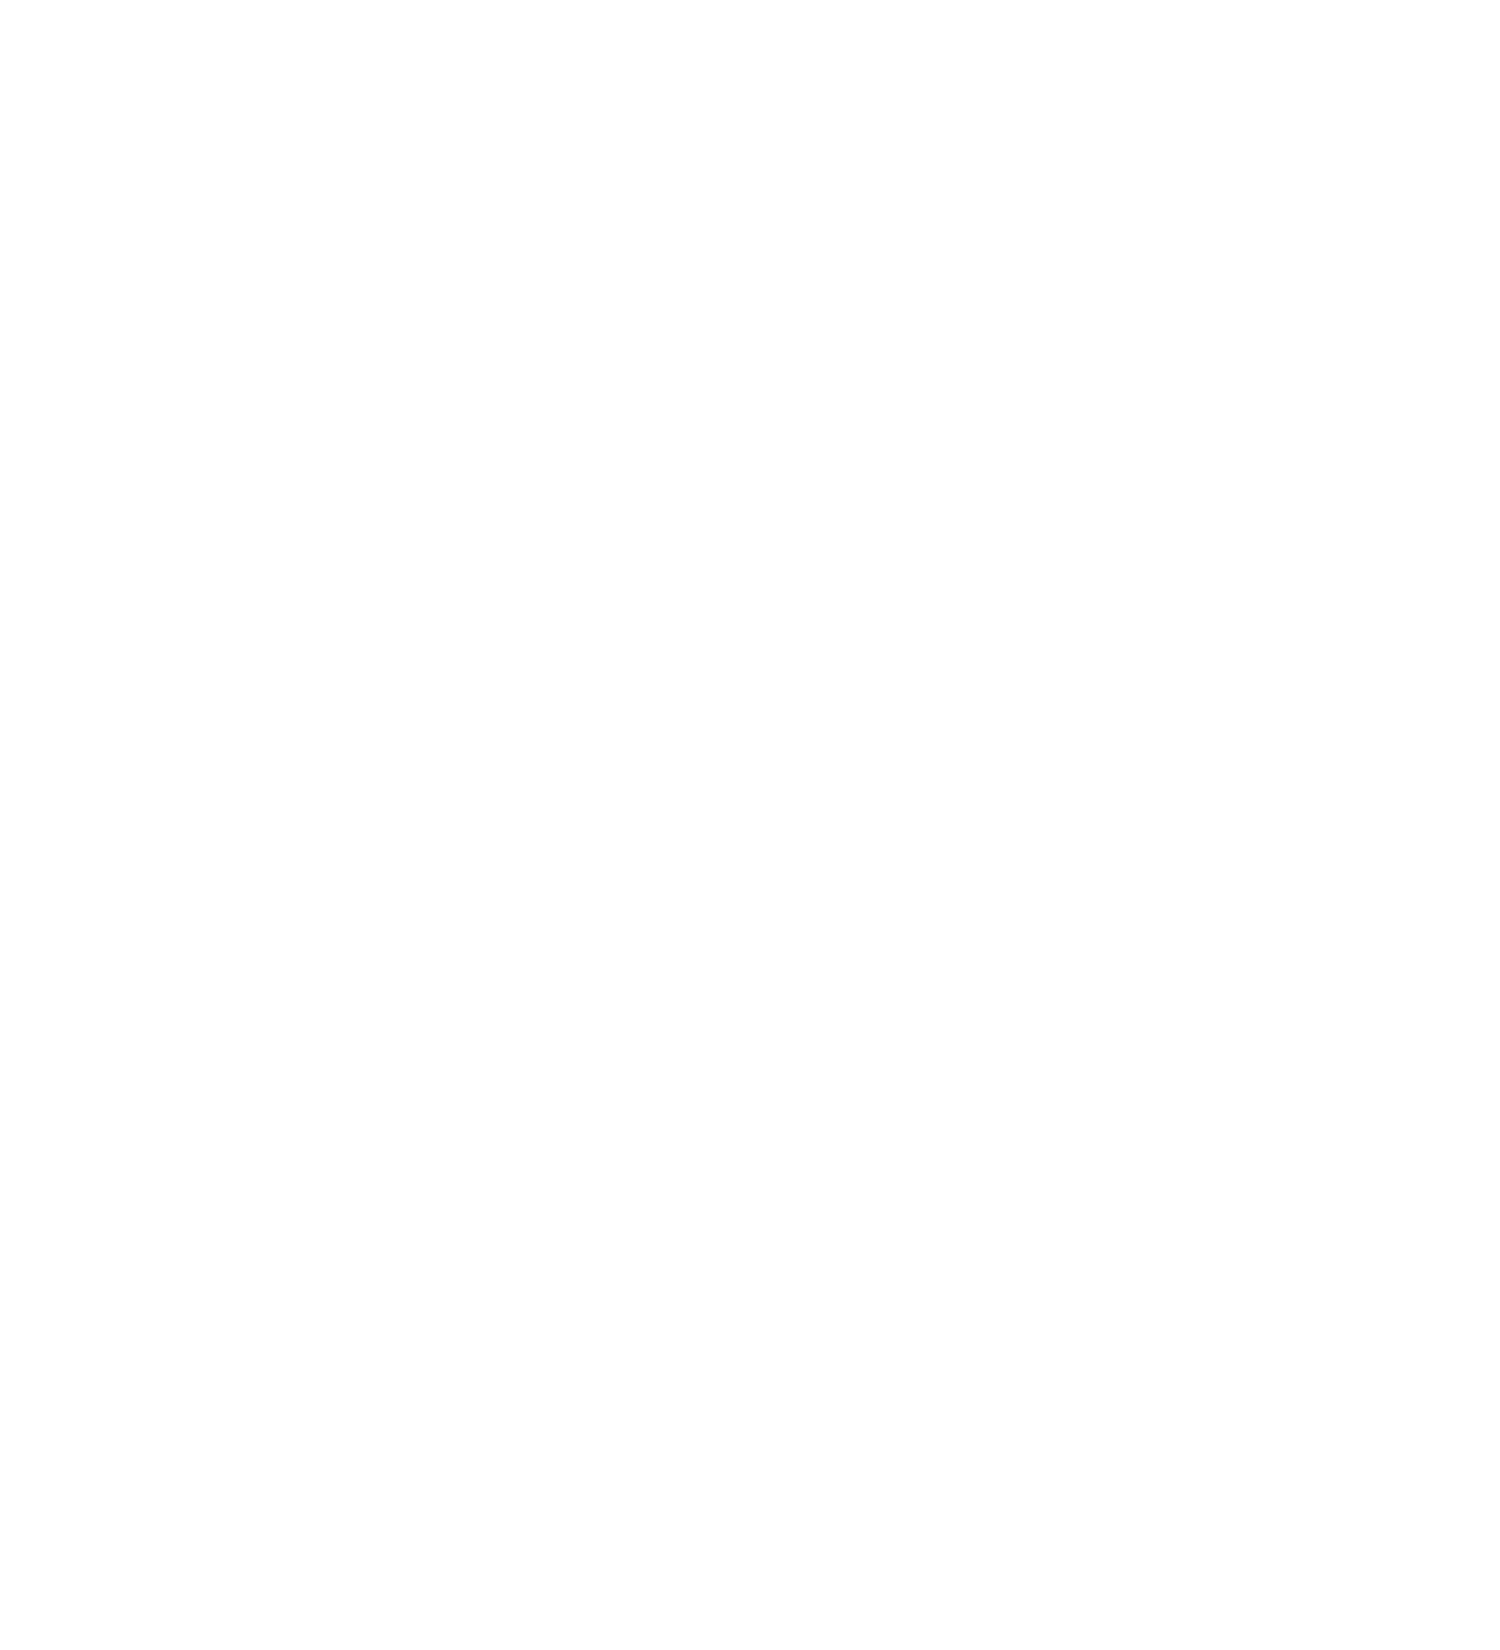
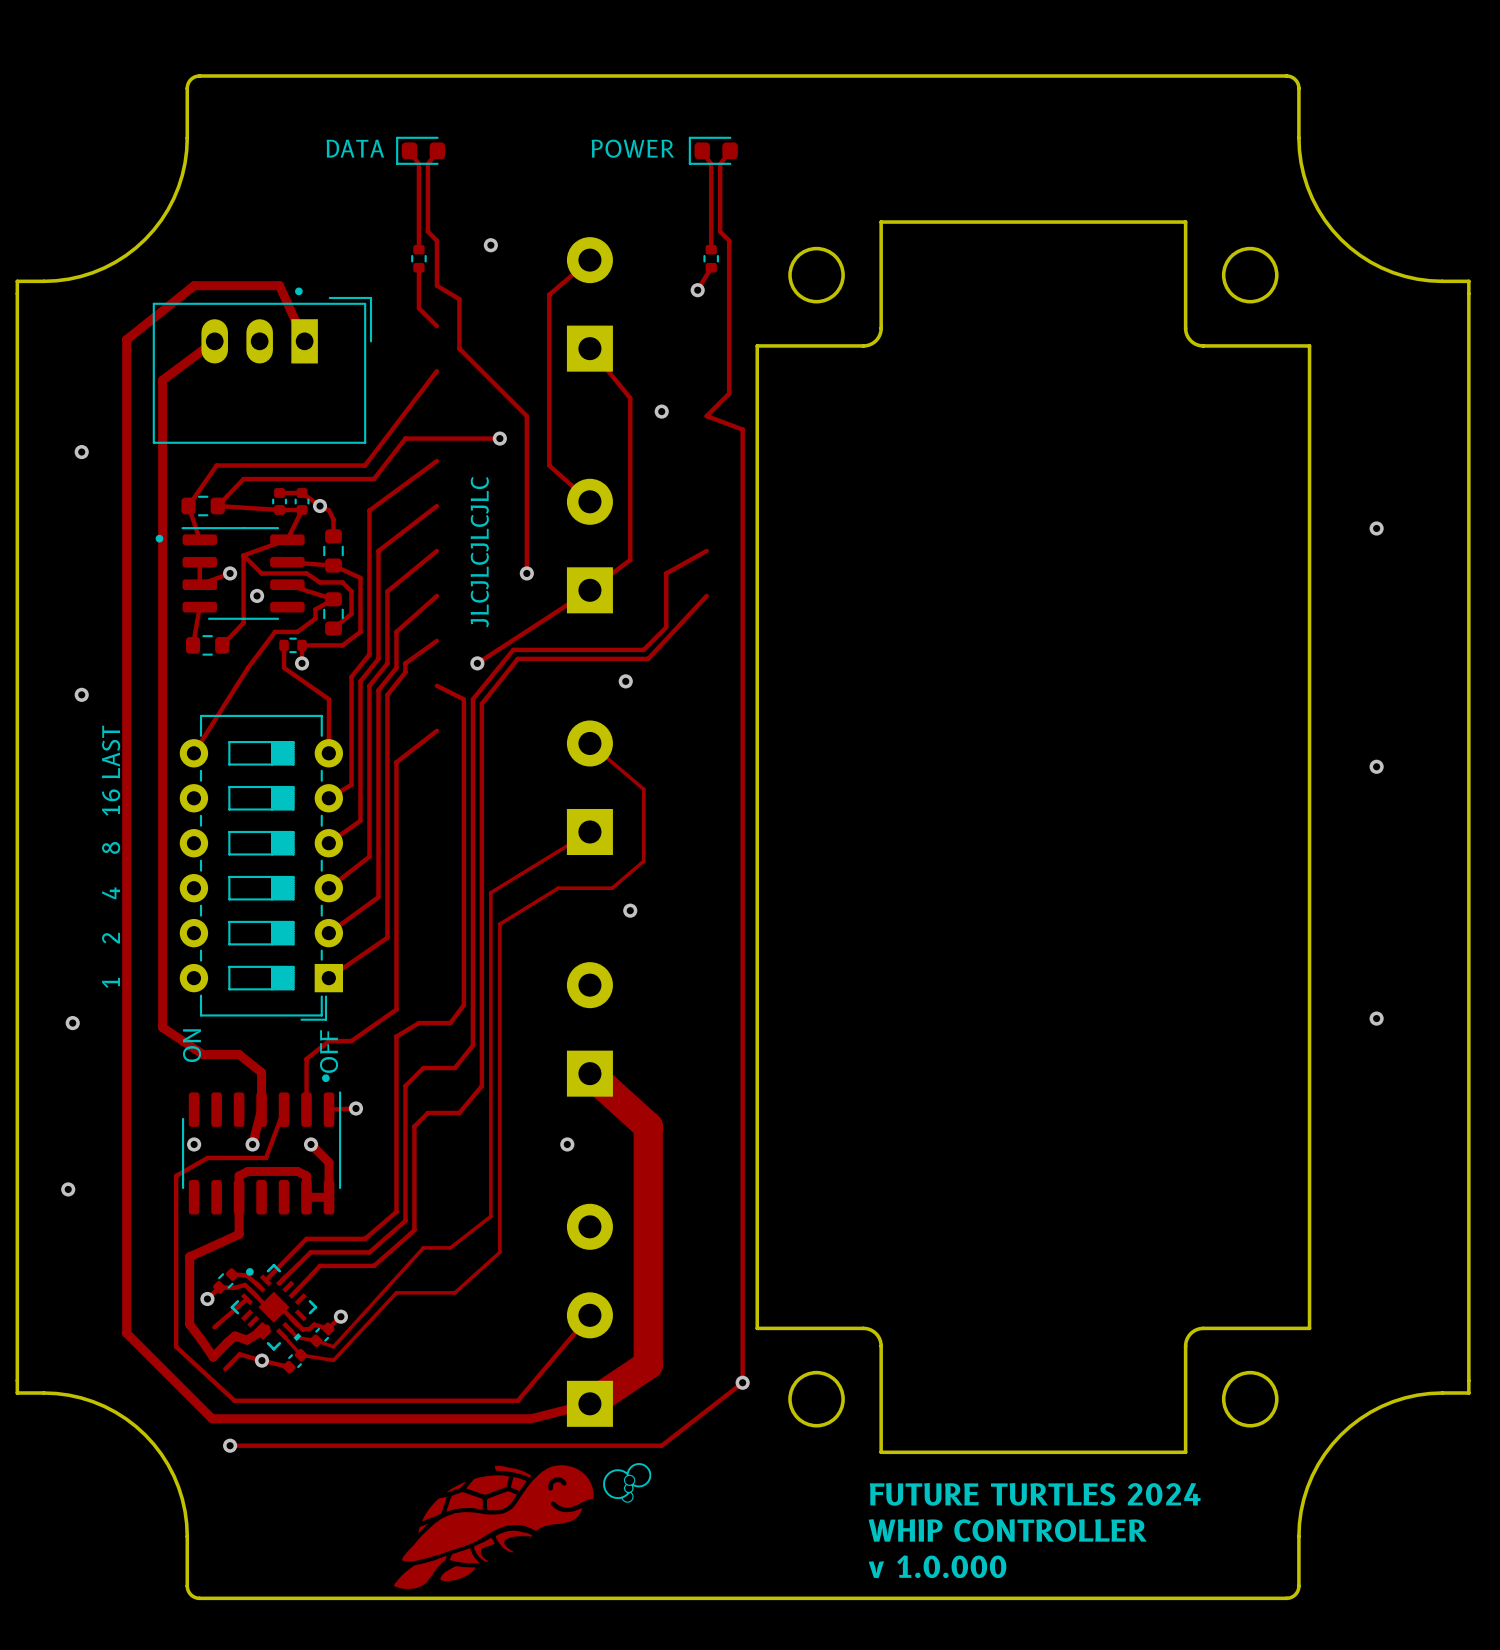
board edge: none -> (199, 76) (1288, 76) (1295, 79) (1298, 86) (1299, 150) (1303, 175) (1312, 198) (1332, 230) (1360, 255) (1393, 272) (1429, 280) (1468, 281) (1468, 1392) (1429, 1393) (1393, 1401) (1360, 1418) (1332, 1444) (1312, 1475) (1303, 1499) (1299, 1523) (1298, 1587) (1294, 1595) (1286, 1598) (198, 1598) (190, 1594) (187, 1587) (186, 1523) (182, 1499) (173, 1475) (153, 1444) (126, 1418) (92, 1401) (56, 1393) (17, 1392) (17, 281) (56, 280) (92, 272) (126, 255) (153, 230) (173, 198) (182, 175) (186, 150) (187, 85) (191, 78) (199, 76)
text: none -> DATA (355, 148)
text: none -> POWER (632, 148)
track: none -> (409, 150) (418, 164) (418, 249)
part: none -> (420, 150)
track: none -> (437, 150) (427, 164) (427, 231) (436, 240) (436, 285) (459, 299) (459, 348) (526, 416) (526, 573)
track: none -> (702, 150) (711, 164) (711, 249)
part: none -> (713, 150)
track: none -> (730, 150) (720, 164) (720, 231) (729, 240) (729, 393) (706, 416) (742, 429) (742, 1382) (661, 1445) (230, 1445)
board edge: none -> (881, 222) (881, 328) (875, 340) (863, 345) (757, 345) (757, 1328) (863, 1328) (875, 1333) (881, 1346) (881, 1452) (1185, 1452) (1185, 1346) (1190, 1333) (1203, 1328) (1309, 1328) (1309, 345) (1203, 345) (1190, 340) (1185, 328) (1185, 222) (881, 222)
via: none -> (490, 245)
round board edge: none -> [788, 246, 845, 304]
round board edge: none -> [1221, 246, 1279, 304]
part: none -> (418, 258)
part: none -> (711, 258)
track: none -> (589, 260) (549, 294) (549, 465) (589, 501)
track: none -> (418, 267) (418, 308) (436, 326)
track: none -> (711, 267) (697, 290)
via: none -> (697, 290)
text: none -> . (298, 291)
part: none -> (589, 304)
track: none -> (214, 341) (162, 380) (162, 1027) (203, 1054) (239, 1054) (261, 1072) (261, 1109) (252, 1144)
track: none -> (304, 341) (279, 285) (194, 285) (126, 339) (126, 1333) (212, 1418) (531, 1418) (589, 1403) (648, 1364) (648, 1126) (589, 1073)
track: none -> (589, 348) (630, 398) (630, 559) (589, 590) (477, 663)
part: none -> (262, 370)
track: none -> (436, 371) (364, 465) (216, 465) (188, 506) (199, 539)
via: none -> (661, 411)
track: none -> (499, 438) (405, 438) (373, 479) (243, 479) (217, 506) (302, 510) (287, 539) (243, 555)
via: none -> (499, 438)
via: none -> (81, 452)
track: none -> (436, 461) (369, 510) (369, 654) (351, 676) (351, 784) (328, 798)
track: none -> (279, 493) (302, 493) (329, 510) (333, 519) (333, 536)
part: none -> (279, 501)
part: none -> (302, 501)
part: none -> (203, 506)
via: none -> (320, 506)
track: none -> (436, 506) (378, 550) (378, 658) (360, 681) (360, 820) (328, 843)
via: none -> (1376, 528)
text: none -> . (159, 538)
text: none -> JLCJLCJLCJLC (479, 552)
part: none -> (589, 546)
part: none -> (333, 550)
track: none -> (436, 550) (387, 591) (387, 663) (369, 685) (369, 856) (328, 888)
track: none -> (706, 550) (666, 573) (666, 627) (643, 649) (513, 649) (472, 699) (472, 1045) (454, 1068) (423, 1068) (405, 1086) (405, 1220) (369, 1252) (310, 1252) (282, 1280)
track: none -> (243, 555) (243, 622) (222, 645)
track: none -> (243, 555) (261, 573) (306, 573) (320, 582) (342, 582) (351, 591) (351, 613) (333, 628)
track: none -> (199, 562) (199, 584) (230, 573)
track: none -> (287, 562) (333, 565) (360, 577) (360, 631) (342, 645) (302, 645) (302, 663)
via: none -> (230, 573)
part: none -> (243, 573)
via: none -> (526, 573)
track: none -> (287, 584) (333, 599) (315, 609) (315, 618) (297, 631) (275, 631) (248, 667) (193, 753)
via: none -> (257, 595)
track: none -> (436, 595) (396, 631) (396, 667) (378, 690) (378, 897) (328, 933)
track: none -> (706, 595) (648, 658) (517, 658) (481, 703) (481, 1086) (459, 1112) (427, 1112) (414, 1126) (414, 1229) (373, 1265) (320, 1265) (294, 1292)
track: none -> (199, 607) (193, 645)
part: none -> (333, 613)
track: none -> (436, 640) (405, 663) (405, 672) (387, 694) (387, 937) (328, 978)
part: none -> (207, 645)
track: none -> (284, 645) (284, 667) (329, 699) (328, 753)
part: none -> (293, 645)
via: none -> (302, 663)
via: none -> (477, 663)
via: none -> (625, 681)
track: none -> (436, 685) (463, 699) (463, 1005) (450, 1023) (418, 1023) (396, 1036) (396, 1211) (364, 1238) (306, 1238) (265, 1280)
via: none -> (81, 694)
track: none -> (436, 730) (396, 762) (396, 1009) (351, 1041) (329, 1041) (306, 1059) (306, 1109)
track: none -> (589, 743) (643, 789) (643, 861) (612, 888) (558, 888) (499, 924) (499, 1252) (454, 1292) (396, 1292) (333, 1360) (301, 1355) (282, 1334)
text: none -> LAST (111, 752)
via: none -> (1376, 766)
part: none -> (589, 787)
text: none -> 16 (111, 802)
track: none -> (589, 831) (490, 892) (490, 1216) (450, 1247) (423, 1247) (333, 1346) (316, 1340) (297, 1337) (288, 1327)
text: none -> 8 (111, 847)
part: none -> (261, 867)
text: none -> 4 (110, 893)
via: none -> (630, 910)
text: none -> 2 (111, 938)
text: none -> 1 (110, 982)
via: none -> (1376, 1018)
via: none -> (72, 1023)
part: none -> (589, 1029)
text: none -> ON (192, 1045)
text: none -> OFF (329, 1051)
text: none -> . (325, 1078)
track: none -> (355, 1108) (329, 1109)
via: none -> (355, 1108)
track: none -> (284, 1109) (266, 1157) (207, 1157) (176, 1175) (176, 1346) (234, 1400) (517, 1400) (589, 1315)
via: none -> (194, 1144)
via: none -> (252, 1144)
track: none -> (311, 1144) (329, 1162) (329, 1197) (306, 1197) (306, 1175) (297, 1171) (248, 1171) (239, 1175) (239, 1234) (189, 1256) (189, 1324) (213, 1357) (235, 1335) (246, 1340) (266, 1328)
via: none -> (311, 1144)
via: none -> (567, 1144)
part: none -> (261, 1152)
via: none -> (68, 1189)
text: none -> . (249, 1271)
track: none -> (232, 1274) (246, 1275) (259, 1286)
part: none -> (225, 1280)
track: none -> (207, 1299) (219, 1287) (234, 1287) (244, 1285) (271, 1311)
via: none -> (207, 1299)
track: none -> (247, 1299) (214, 1327)
part: none -> (273, 1307)
track: none -> (281, 1308) (302, 1329) (309, 1329) (314, 1324) (328, 1328) (340, 1316)
part: none -> (589, 1315)
via: none -> (340, 1316)
part: none -> (322, 1334)
via: none -> (261, 1360)
part: none -> (295, 1361)
track: none -> (289, 1367) (239, 1354) (225, 1369)
round board edge: none -> [788, 1370, 845, 1428]
round board edge: none -> [1221, 1370, 1279, 1428]
via: none -> (742, 1382)
via: none -> (230, 1445)
drawing: none -> [394, 1463, 652, 1589]
text: none -> FUTURE TURTLES 2024 (1035, 1494)
text: none -> WHIP CONTROLLER (1007, 1530)
text: none -> v 1.0.000 (937, 1566)

